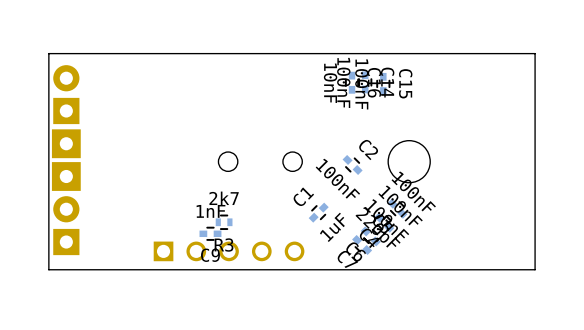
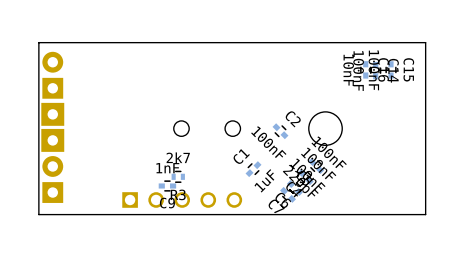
C16 position: (352, 82) -> (365, 69)
C14 position: (365, 82) -> (375, 70)
C15 position: (383, 83) -> (391, 69)

